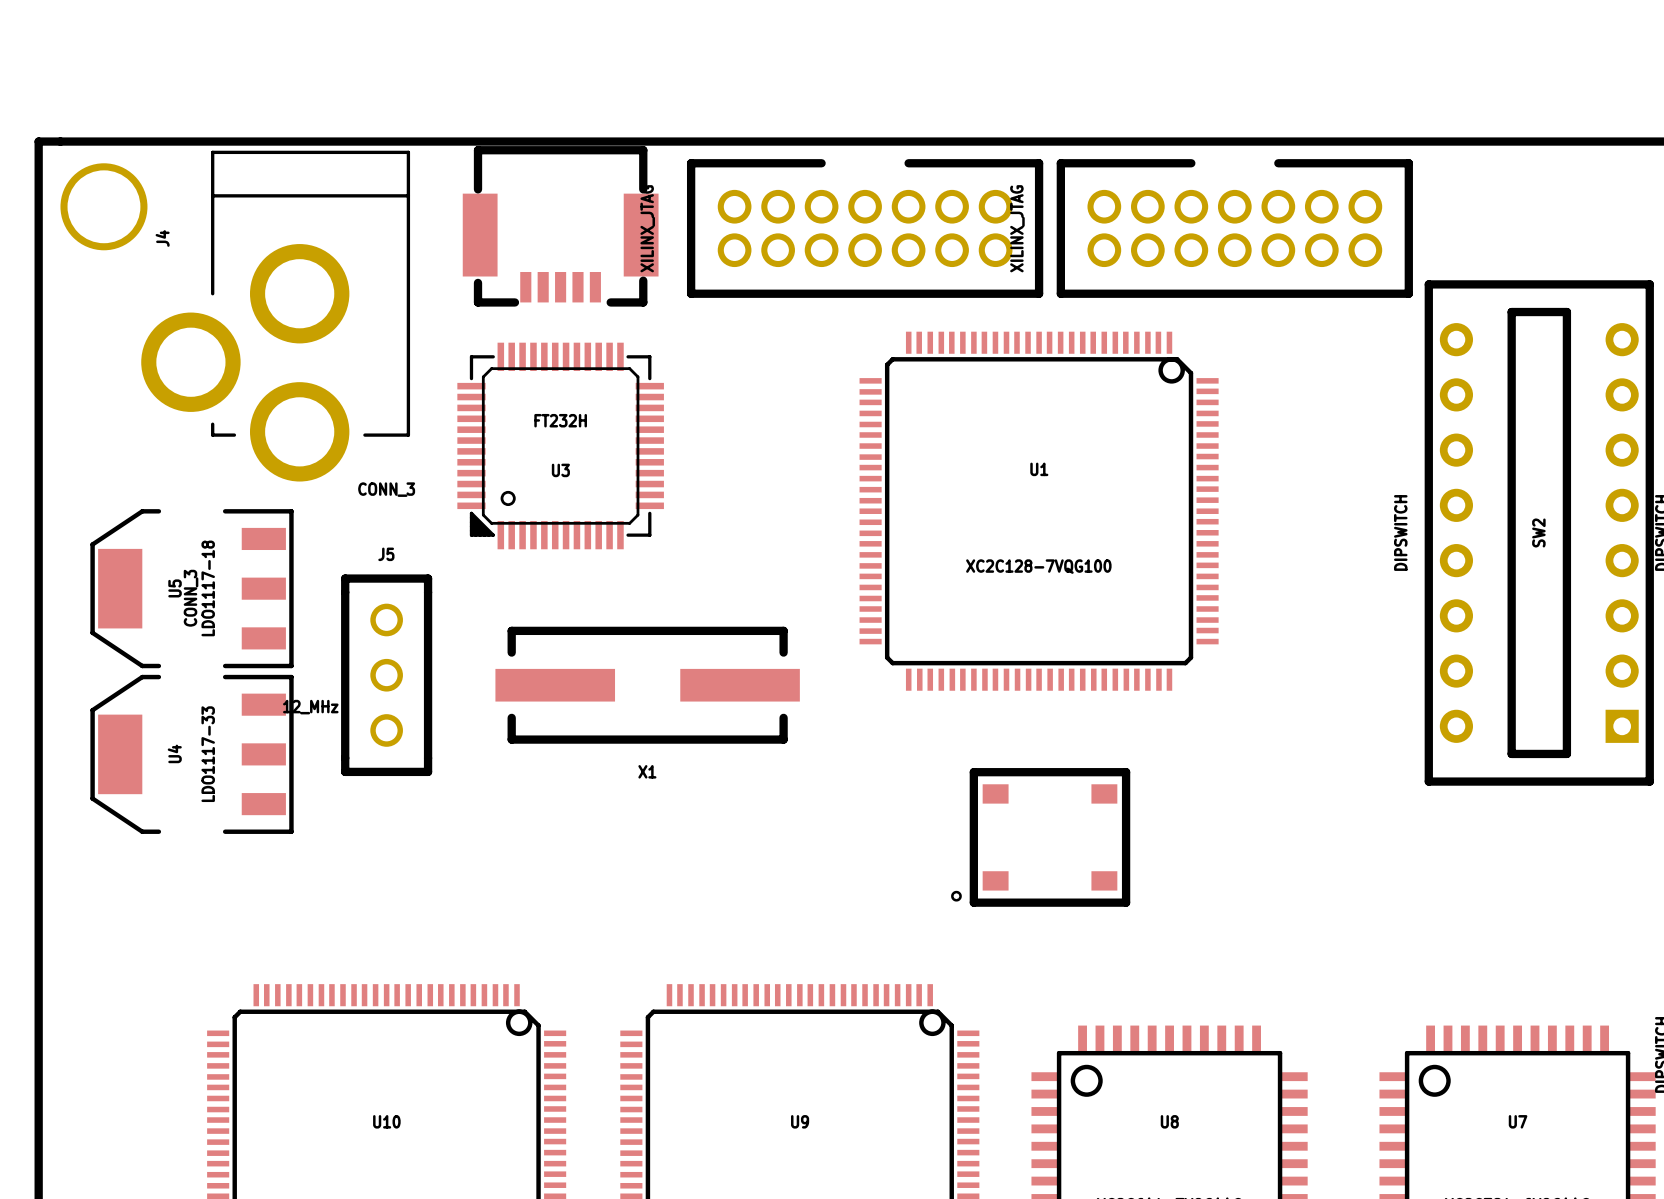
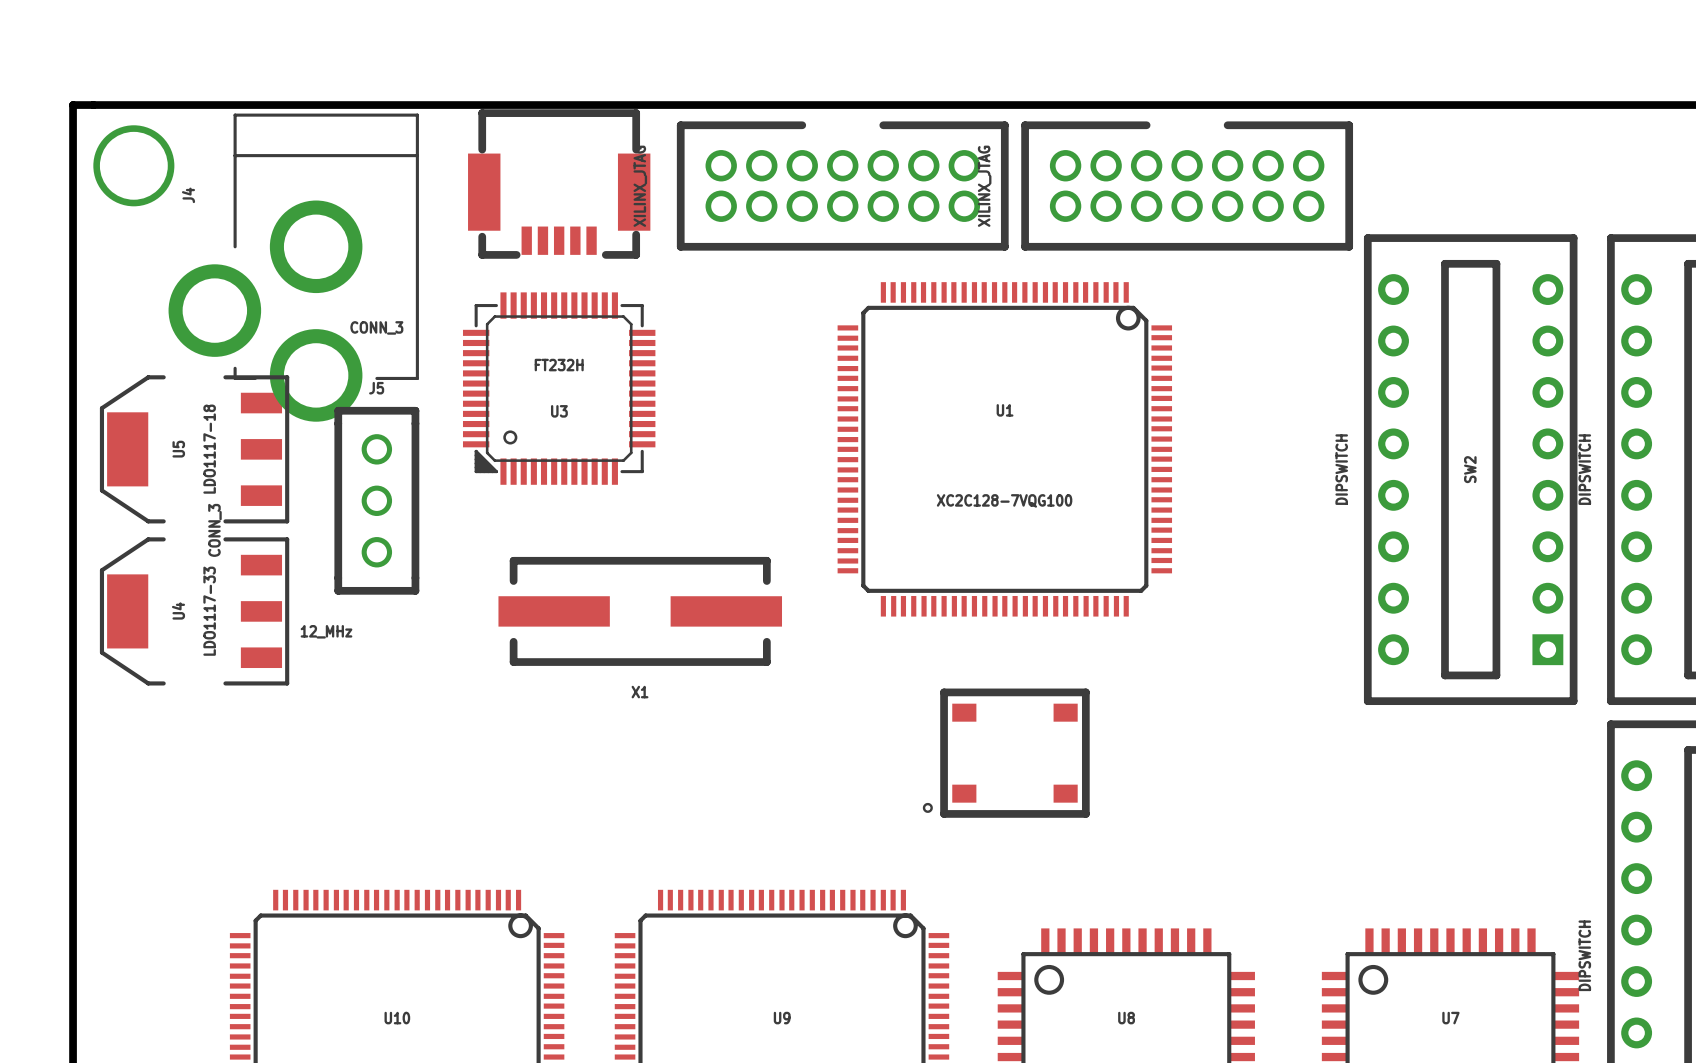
U5 position: (192, 588) -> (194, 449)
J5 position: (386, 675) -> (376, 500)
U4 position: (192, 754) -> (194, 611)

